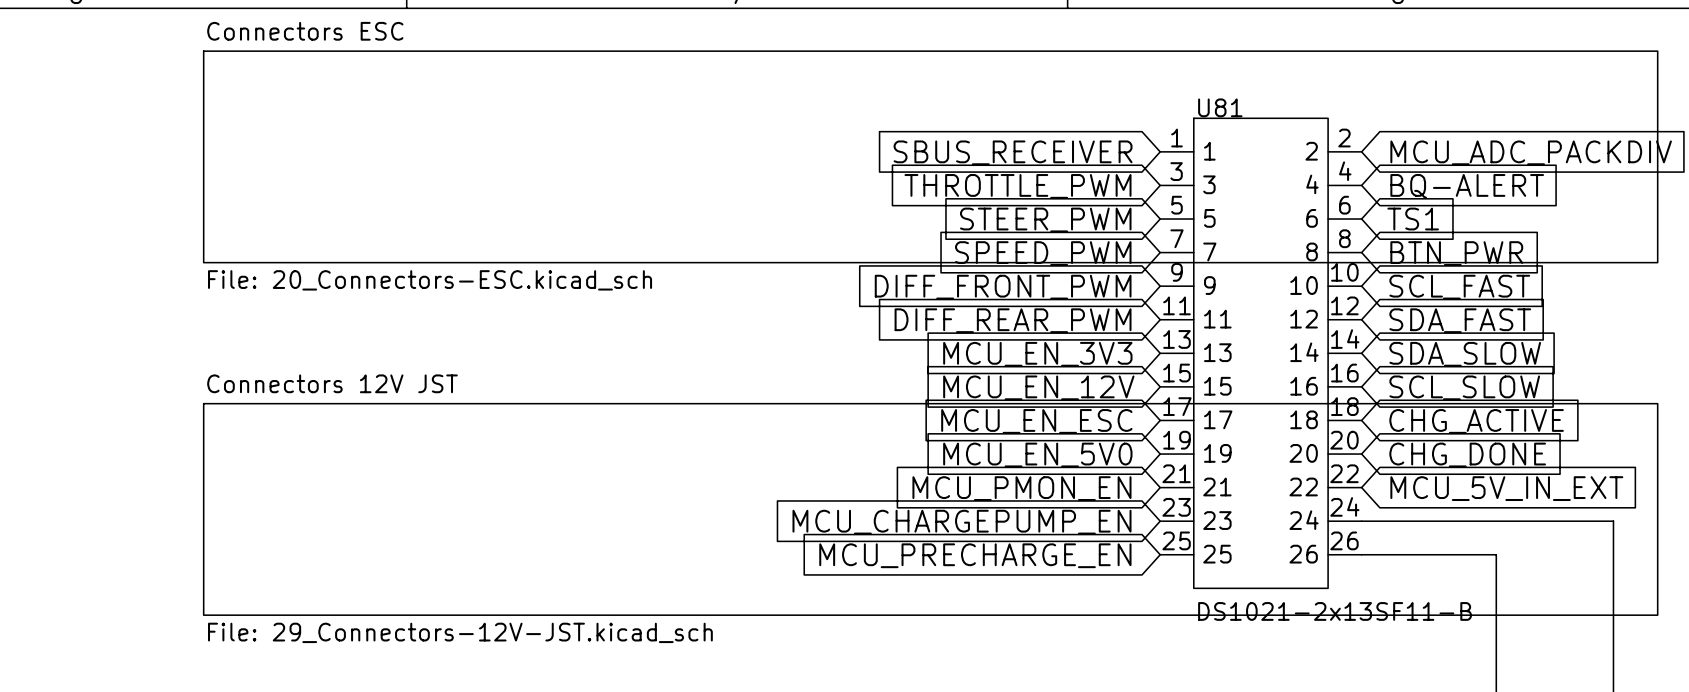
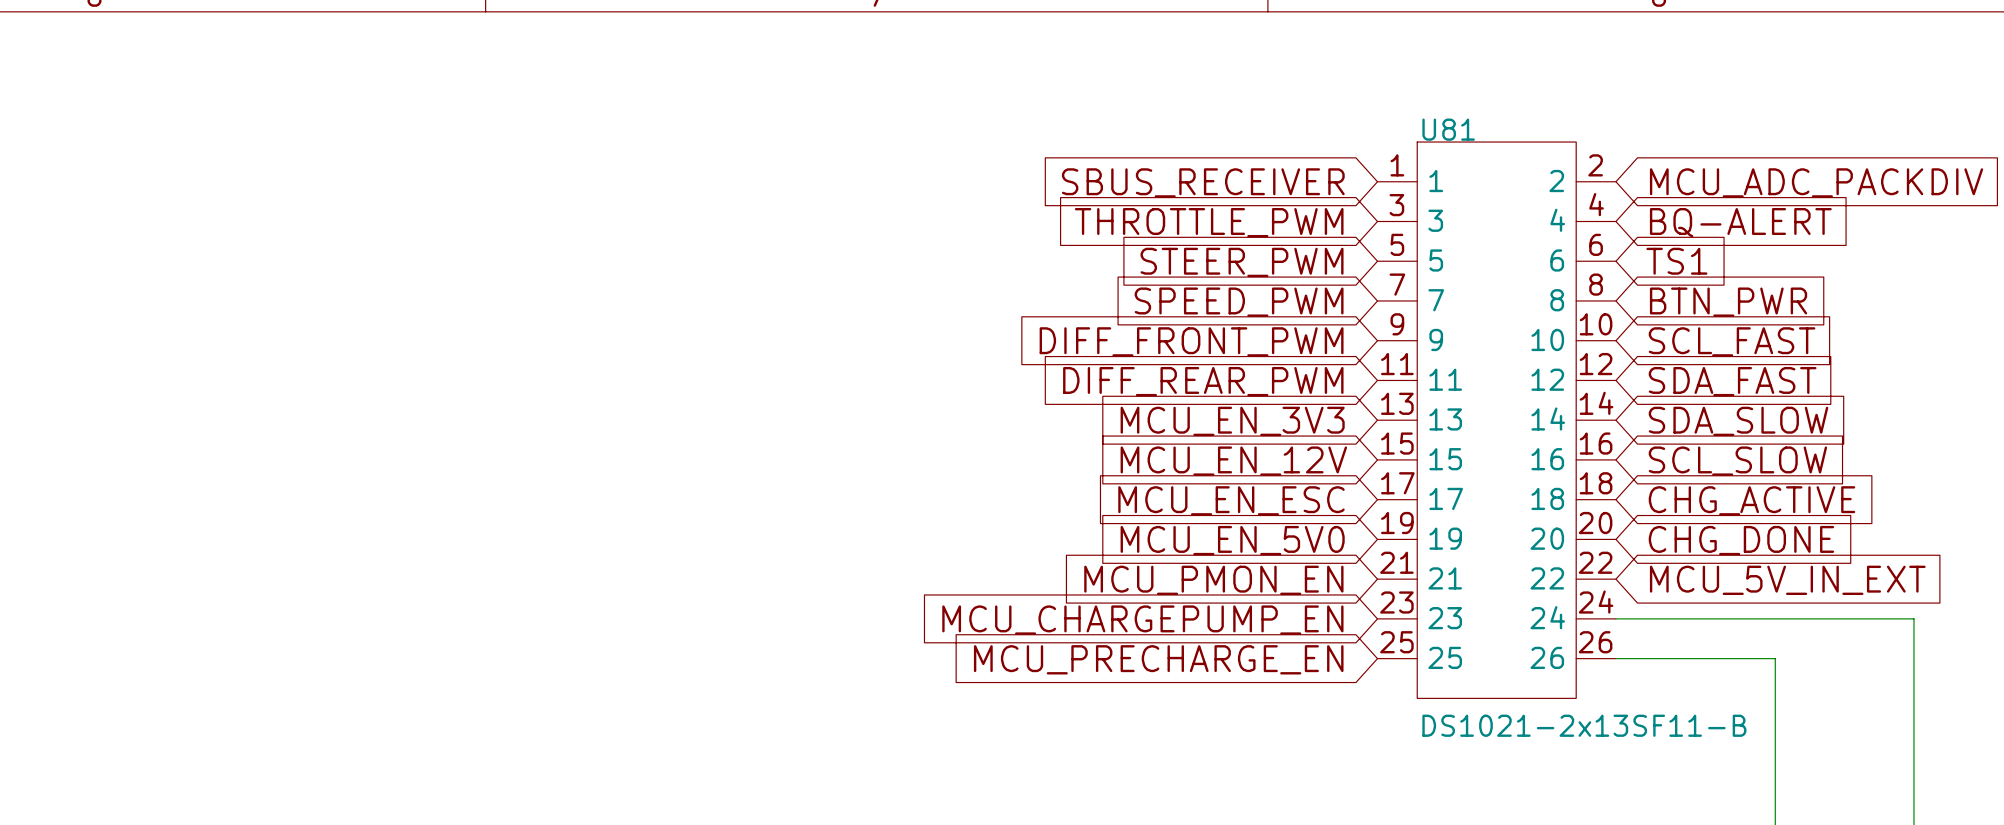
sheet Connectors ESC: File: 20_Connectors-ESC.kicad_sch (930, 156) -> none
sheet Connectors 12V JST: File: 29_Connectors-12V-JST.kicad_sch (930, 509) -> none

